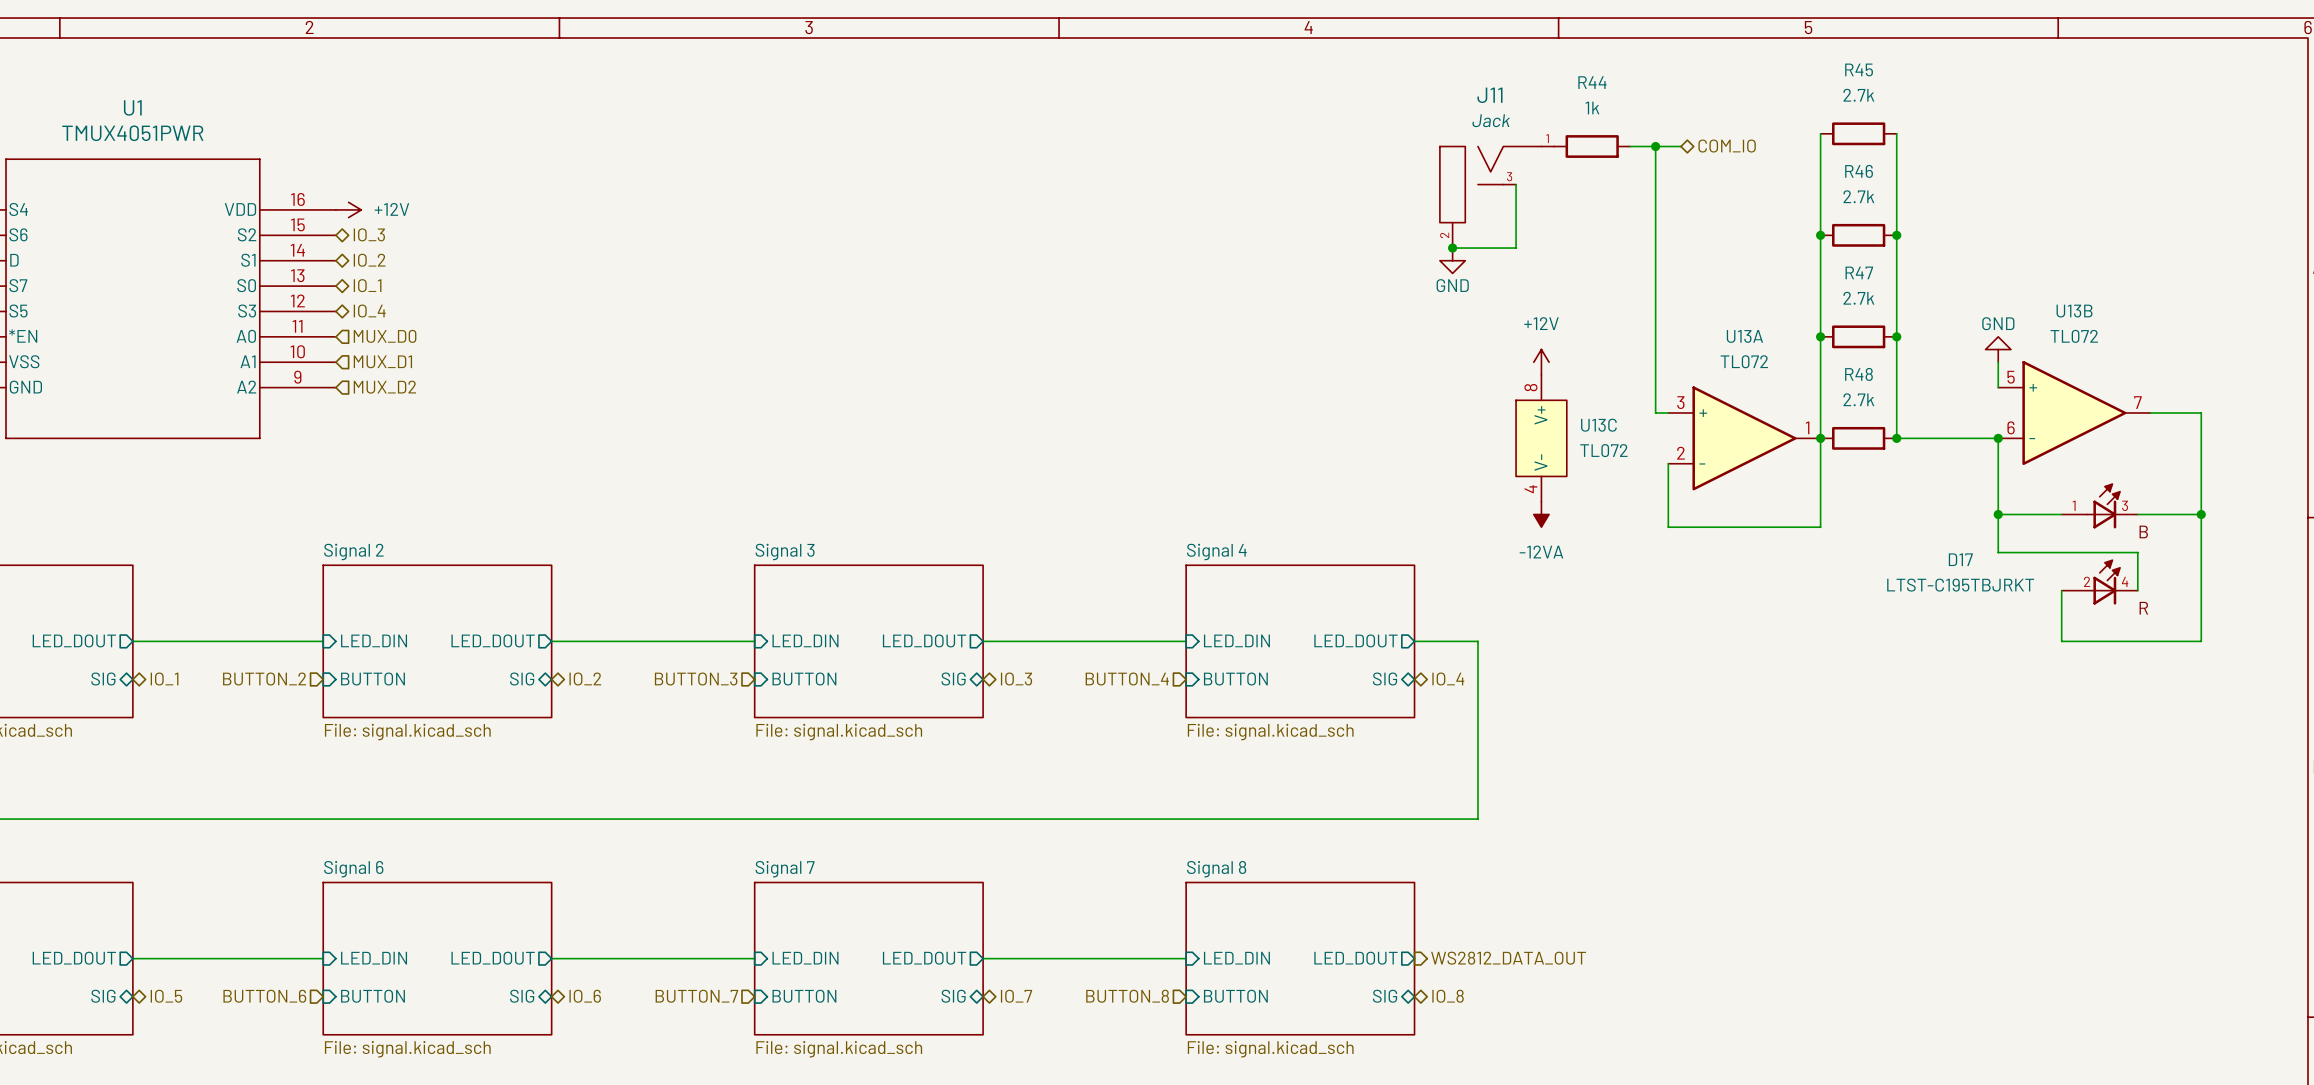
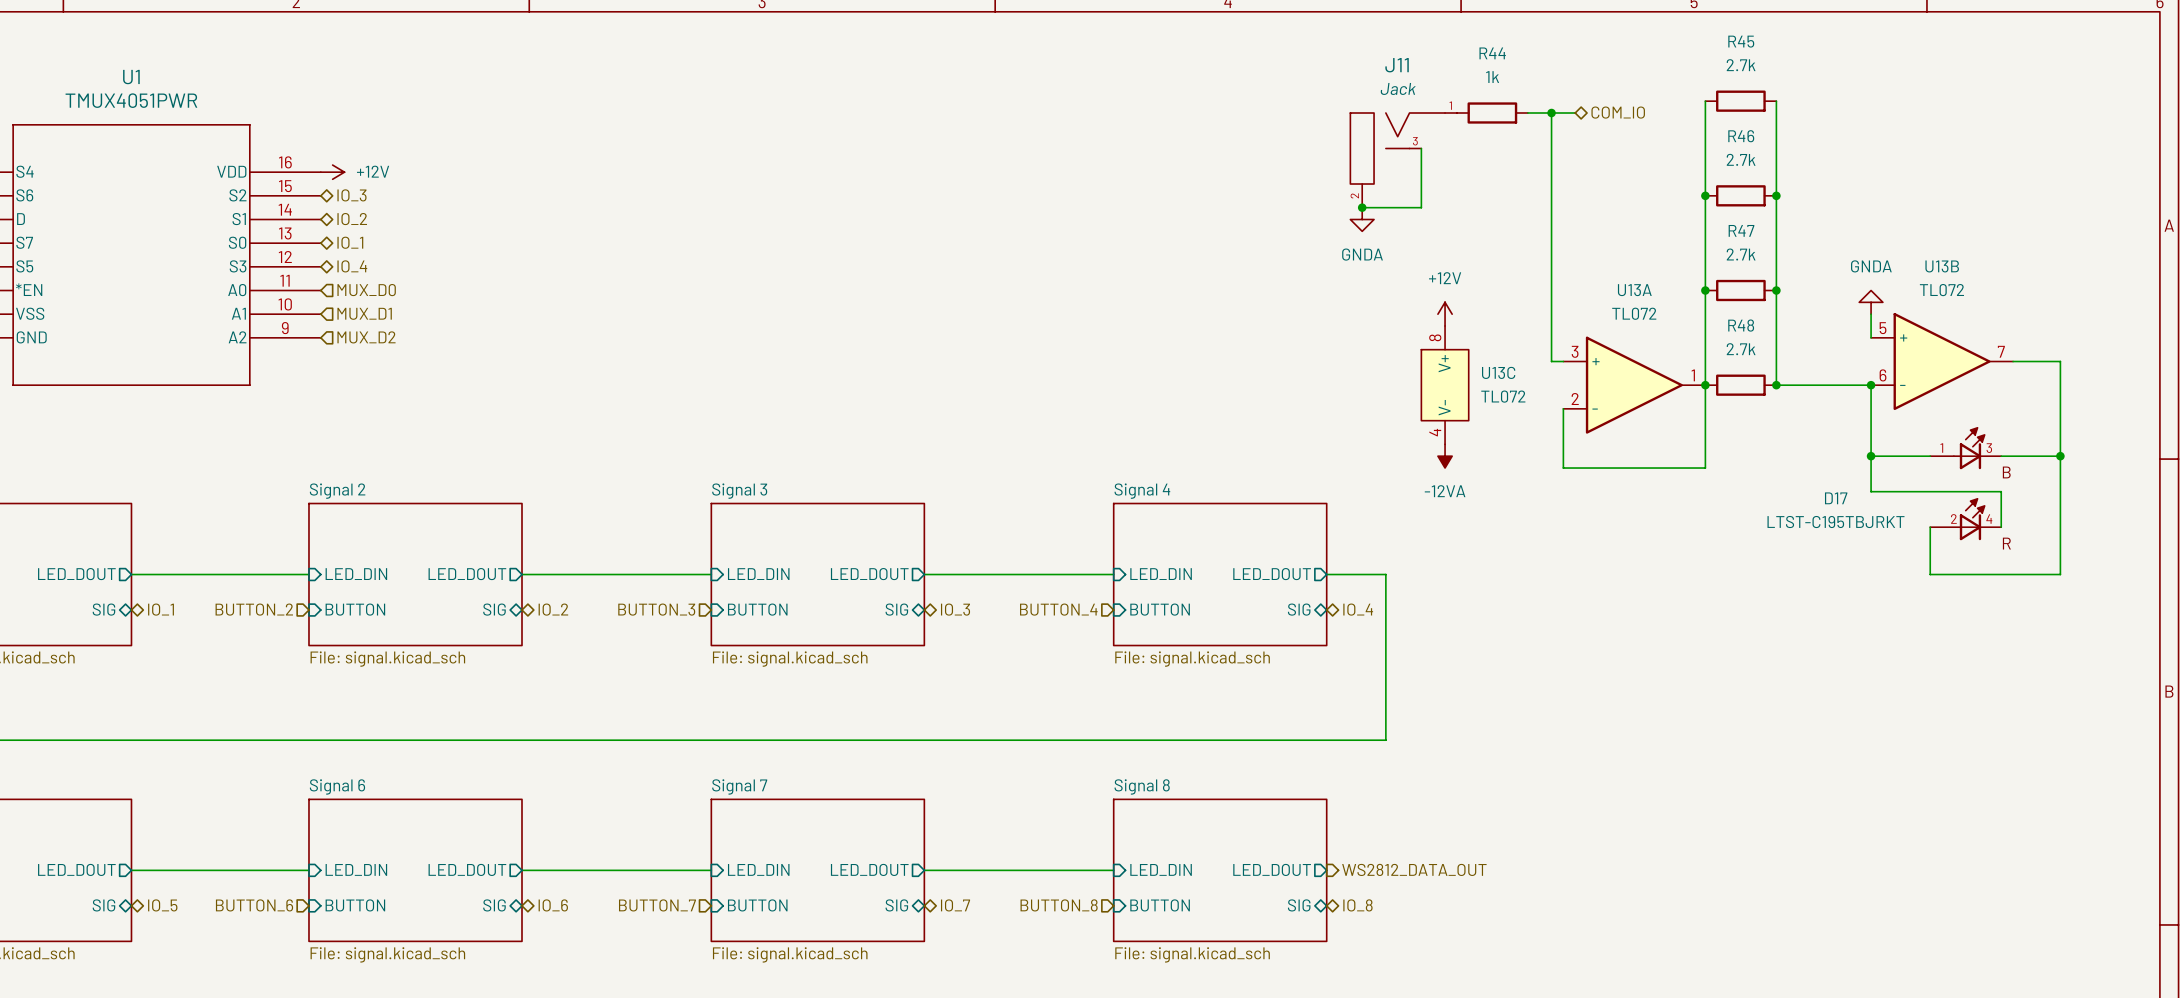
power symbol: GND (1452, 260) -> GNDA (1362, 219)
power symbol: GND (1998, 349) -> GNDA (1871, 302)

